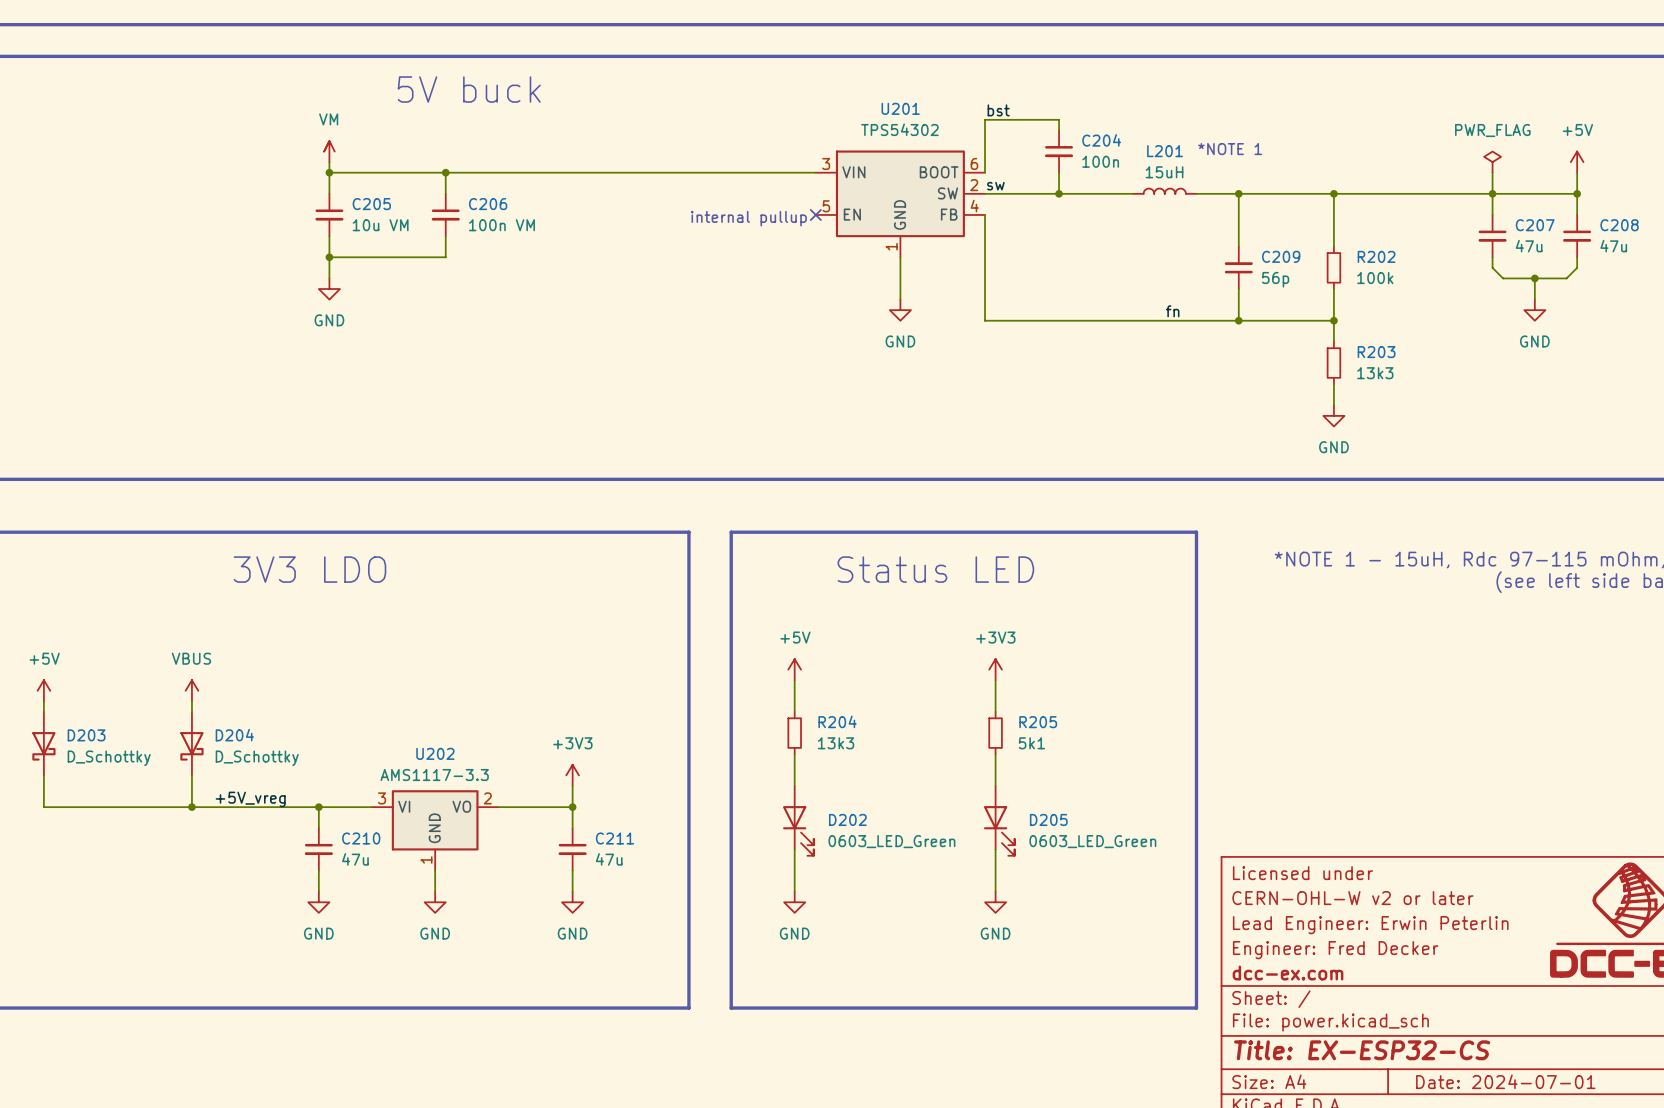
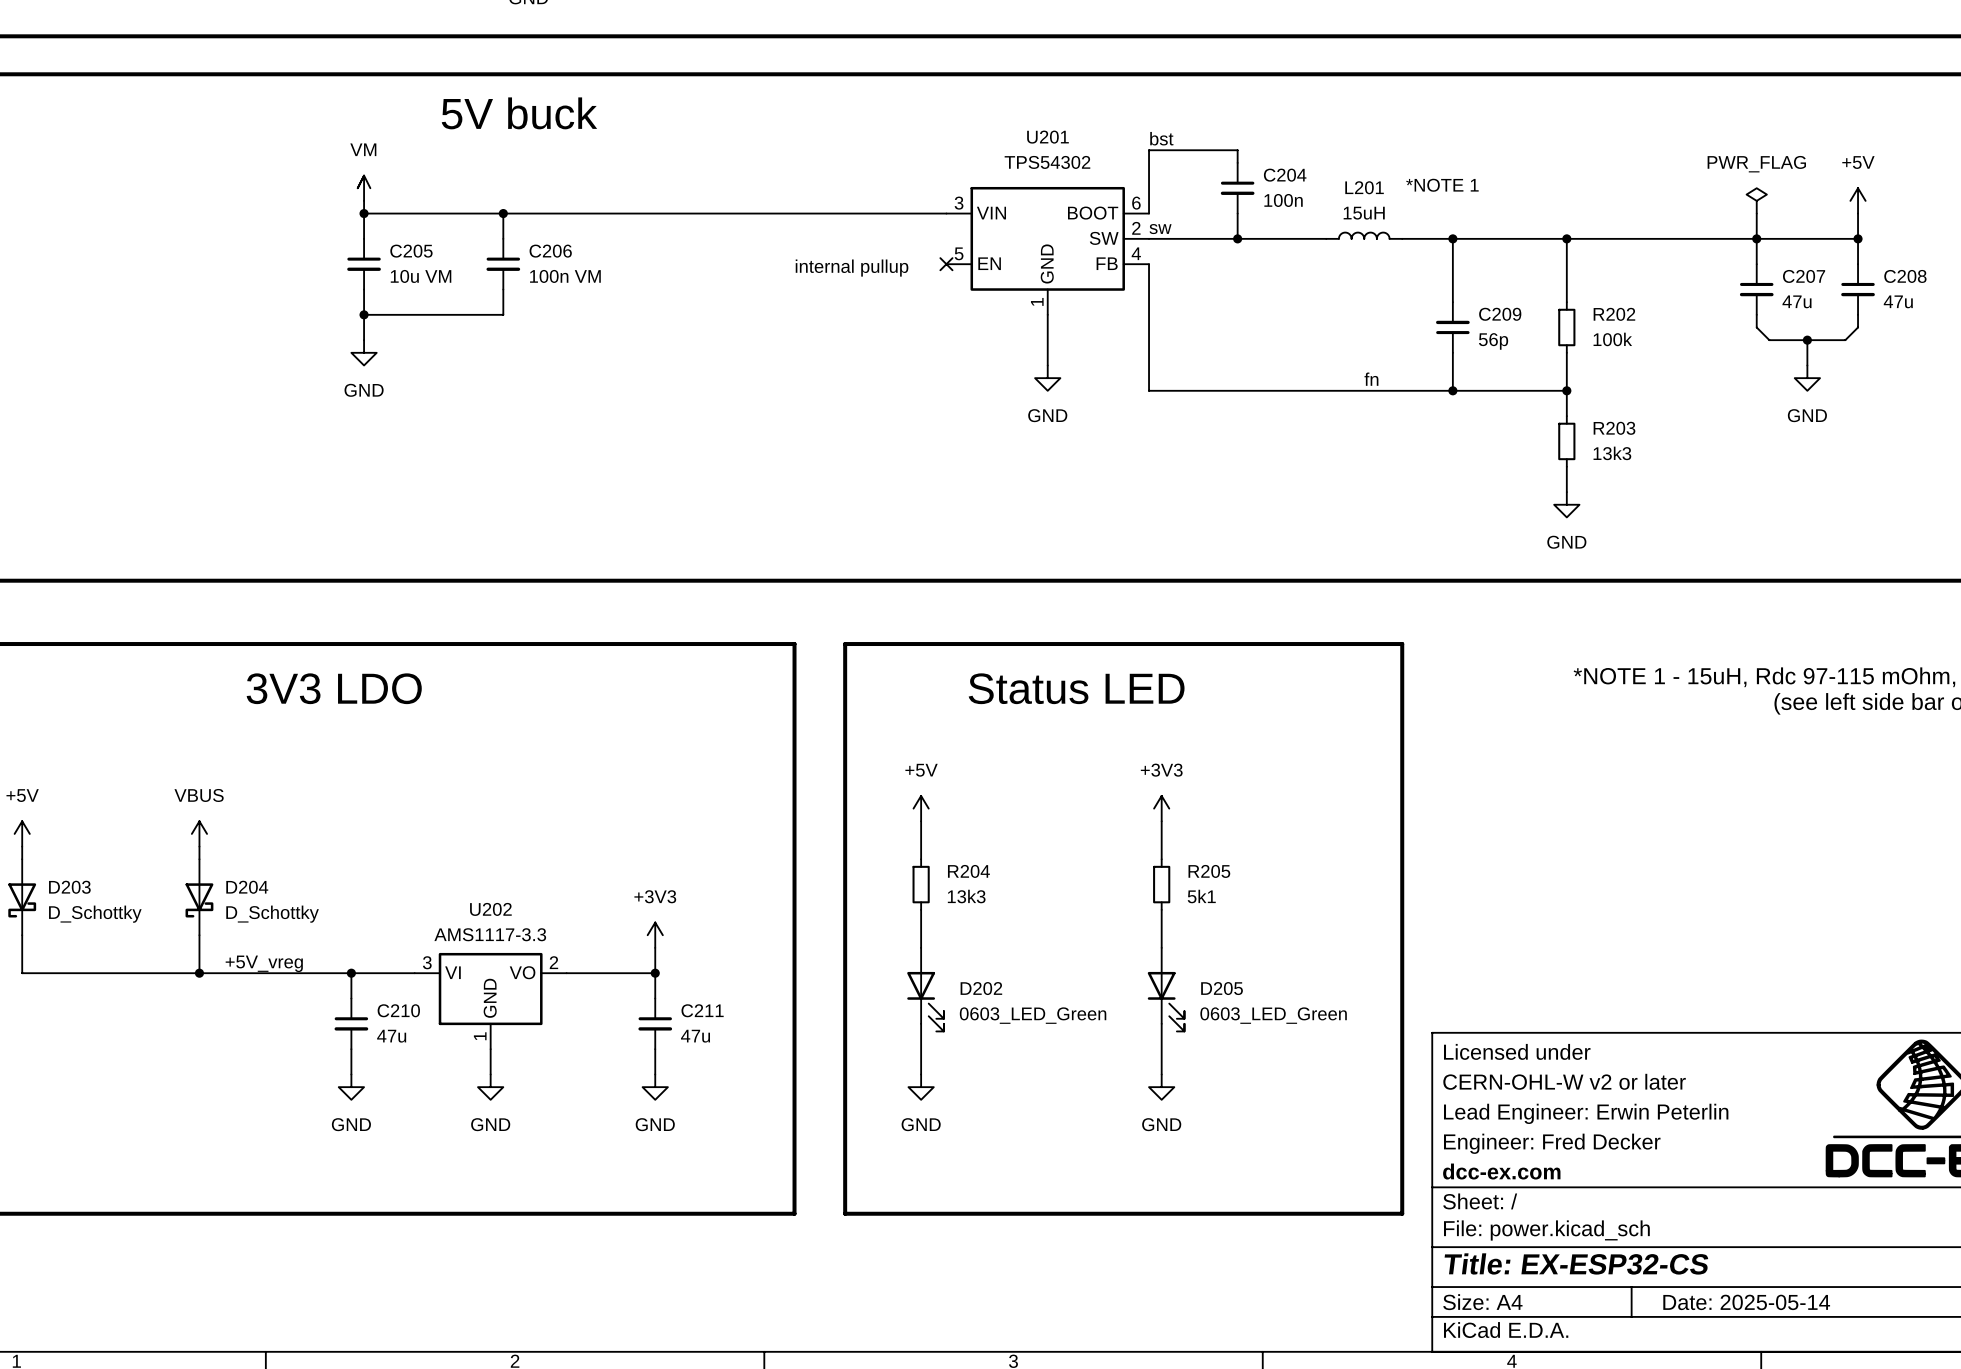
title block: Date: 2024-07-01 (1505, 1081) -> Date: 2025-05-14 (1746, 1302)

